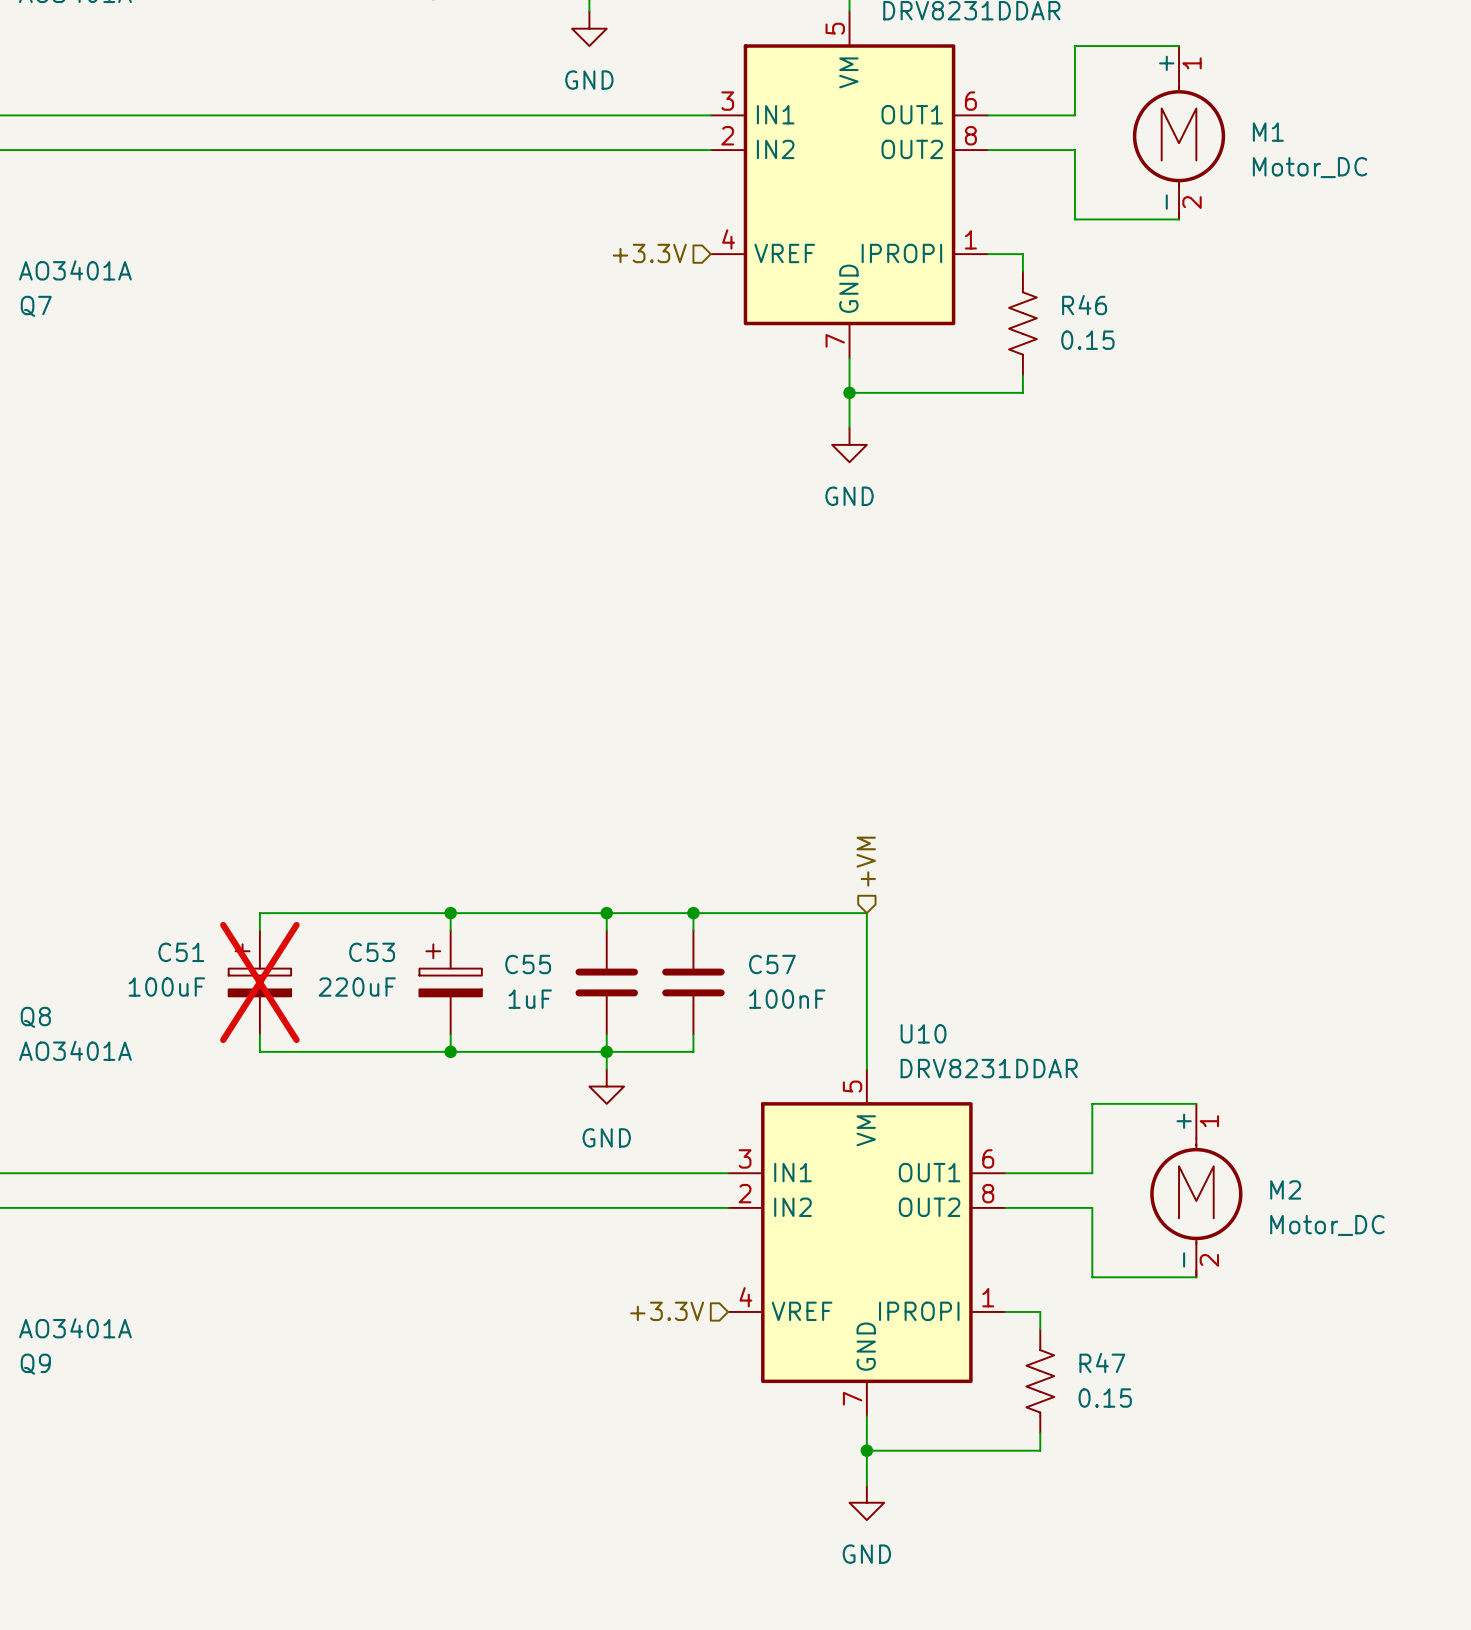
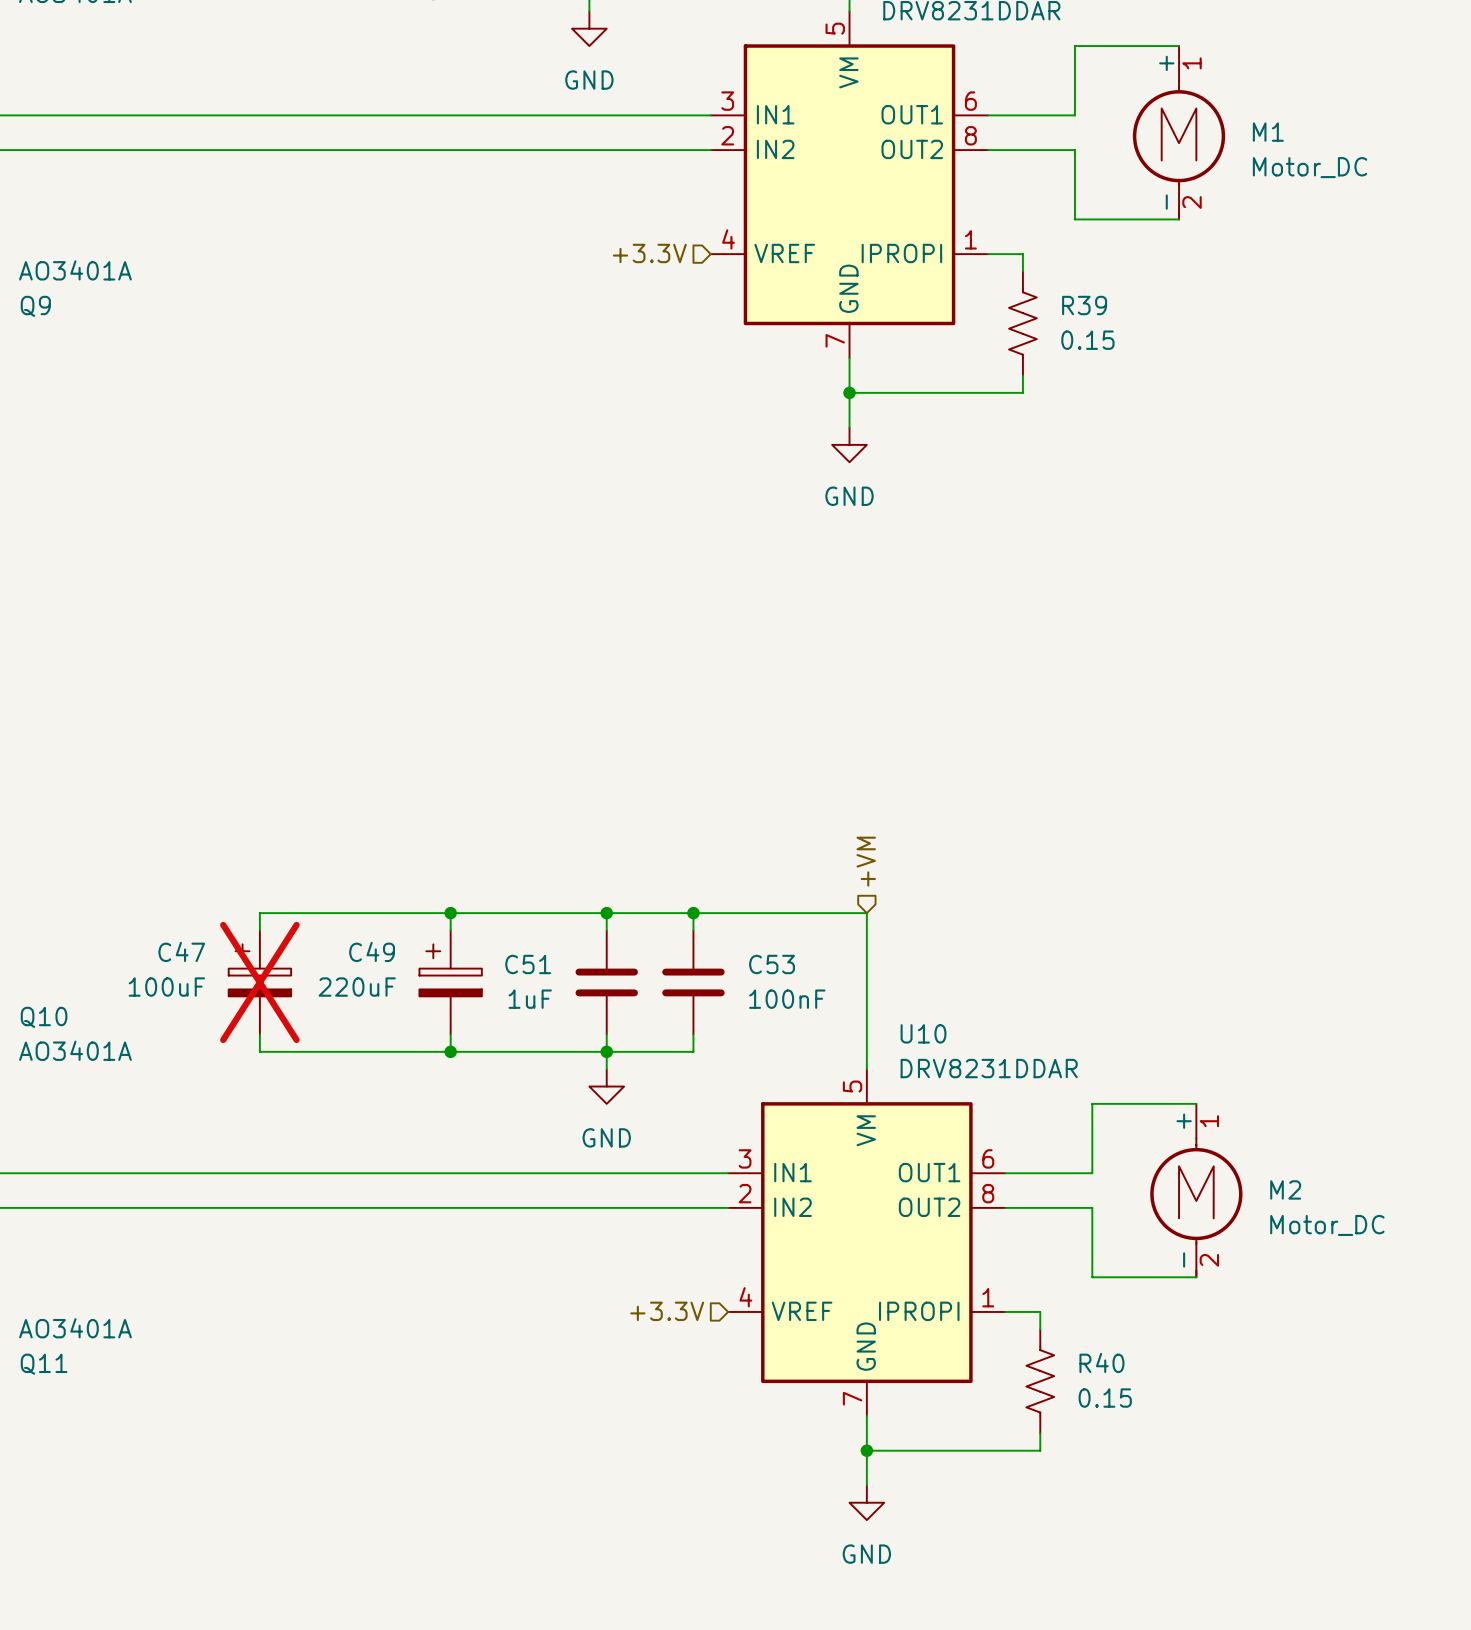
R46 name: R46 (1084, 305) -> R39 (1084, 305)
Q7 name: Q7 (36, 306) -> Q9 (35, 306)
C51 name: C51 (181, 952) -> C47 (181, 951)
C53 name: C53 (372, 952) -> C49 (372, 951)
C55 name: C55 (528, 964) -> C51 (528, 964)
C57 name: C57 (772, 964) -> C53 (772, 964)
Q8 name: Q8 (35, 1017) -> Q10 (44, 1017)
R47 name: R47 (1102, 1362) -> R40 (1101, 1362)
Q9 name: Q9 (35, 1364) -> Q11 (44, 1364)

